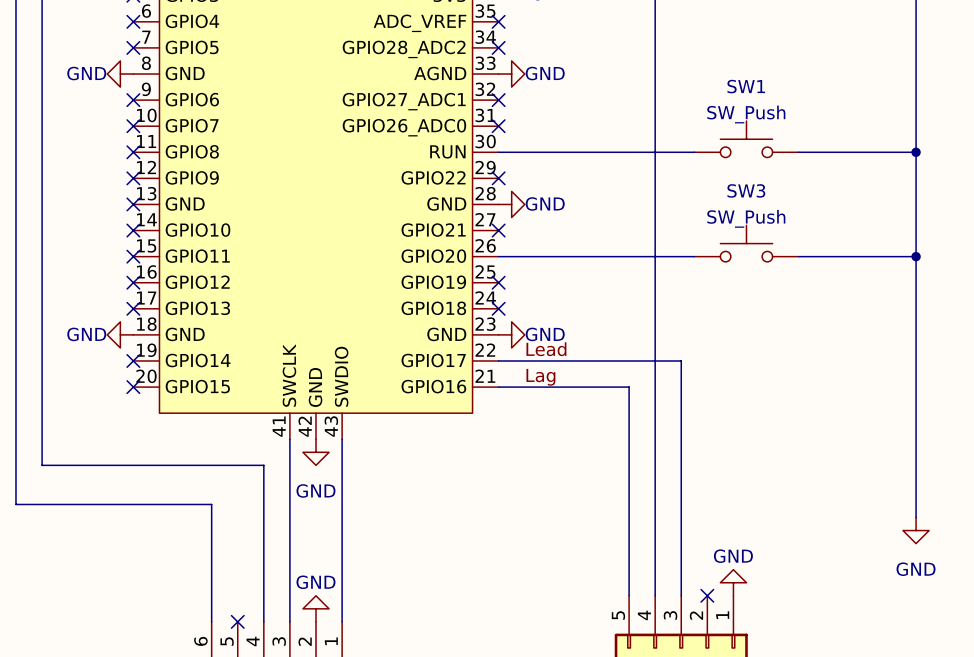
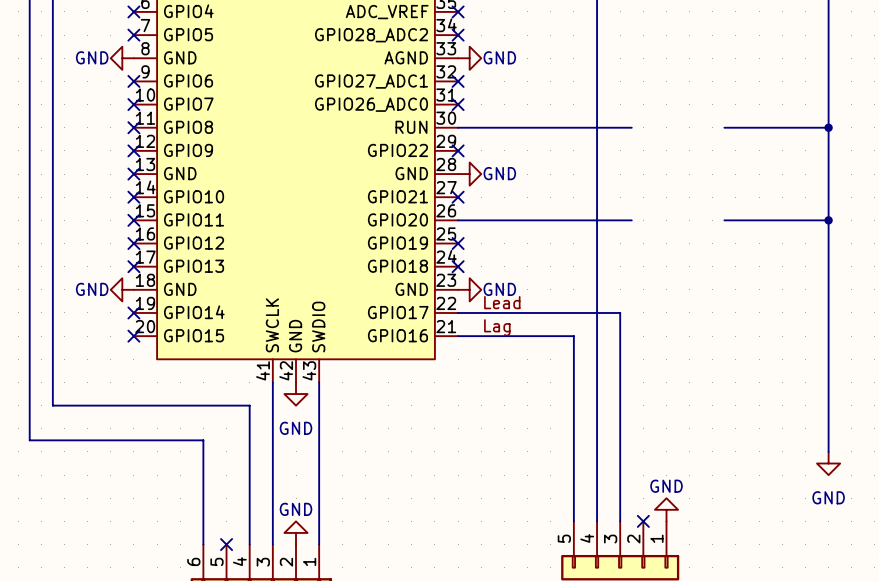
SW1: SW_Push (746, 139) -> none
SW3: SW_Push (746, 243) -> none

